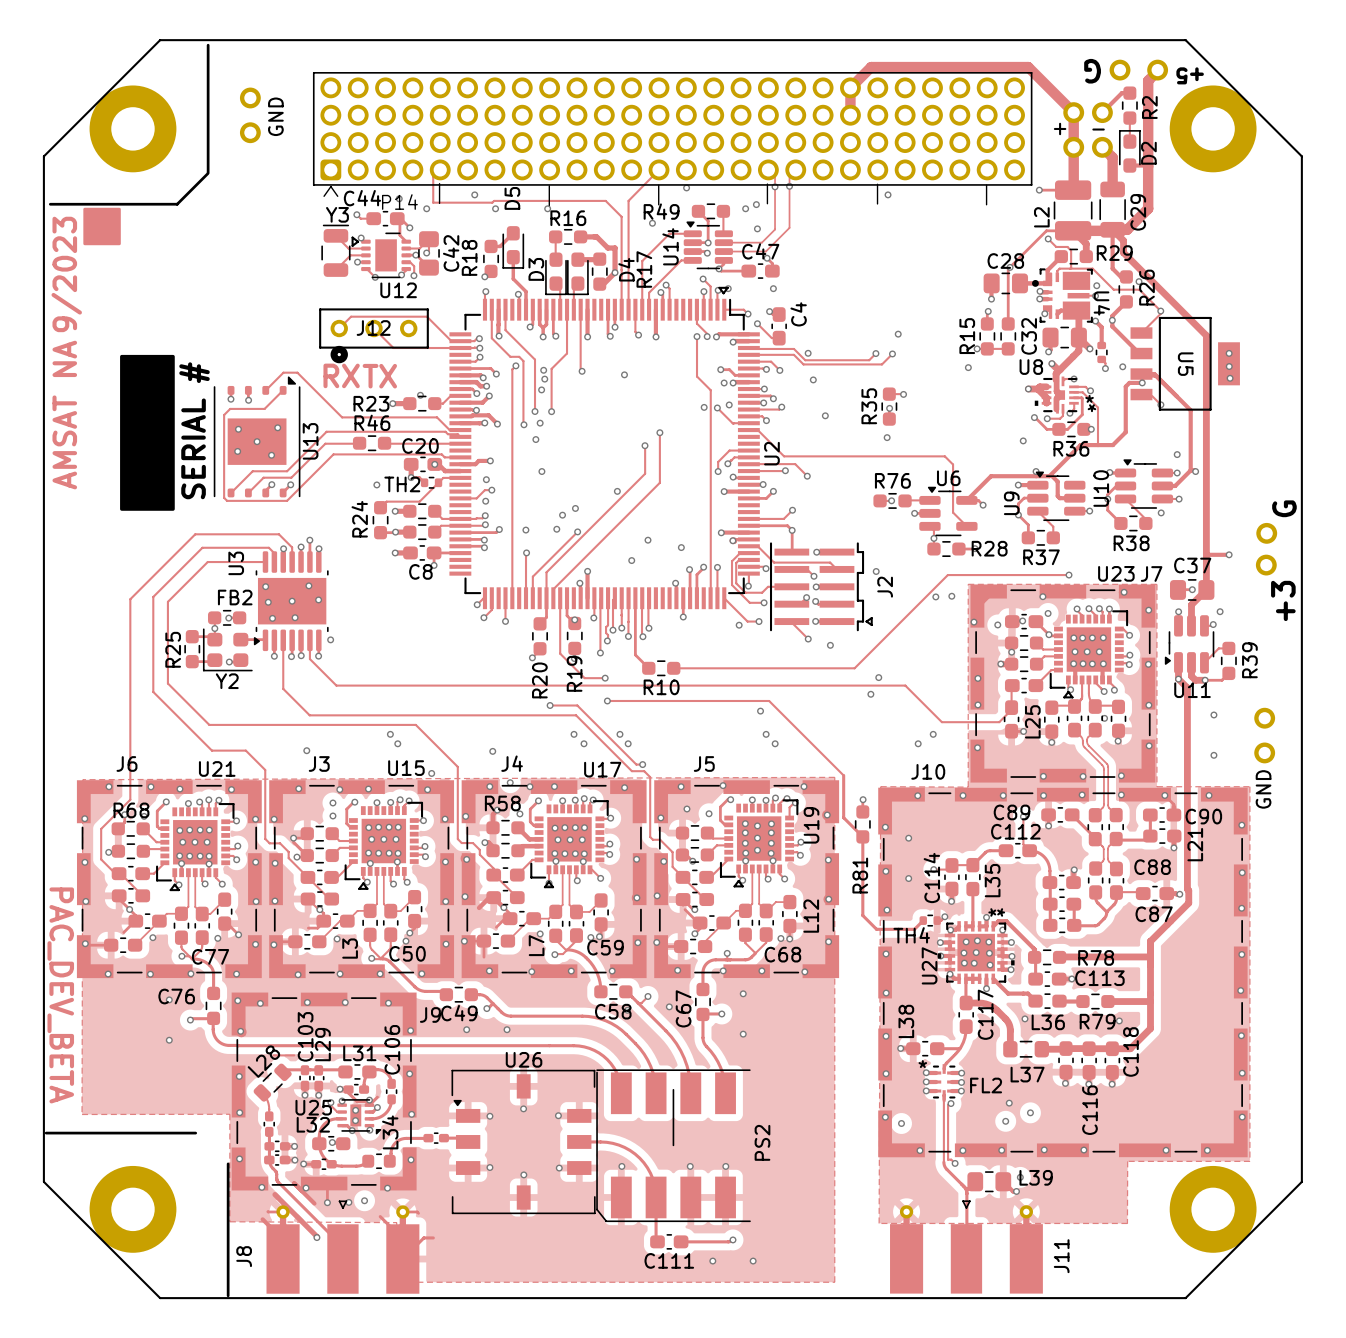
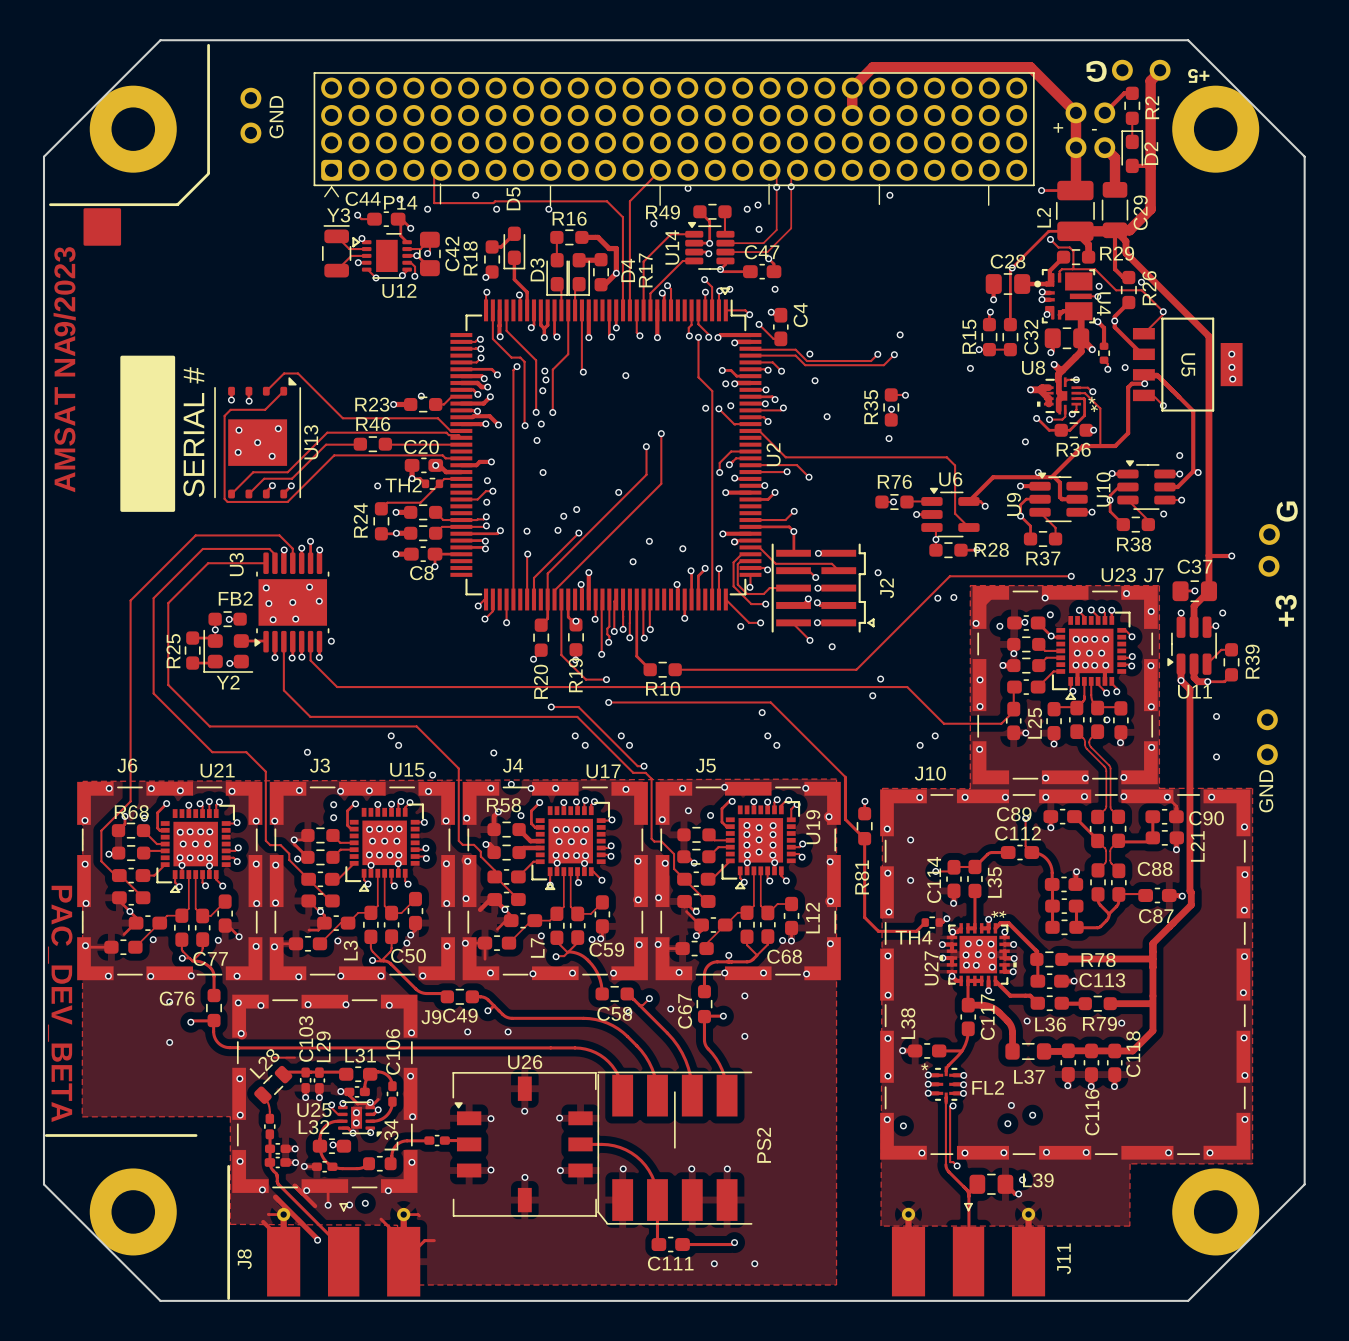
track: none -> (691, 310) (689, 335)
track: (339, 328) (351, 316) (427, 316) (451, 341) (460, 341) -> none
track: (373, 328) (393, 348) (460, 348) -> none
J12: (373, 335) -> none
via: none -> (689, 335)
text: RX (341, 375) -> none
text: TX (379, 376) -> none

